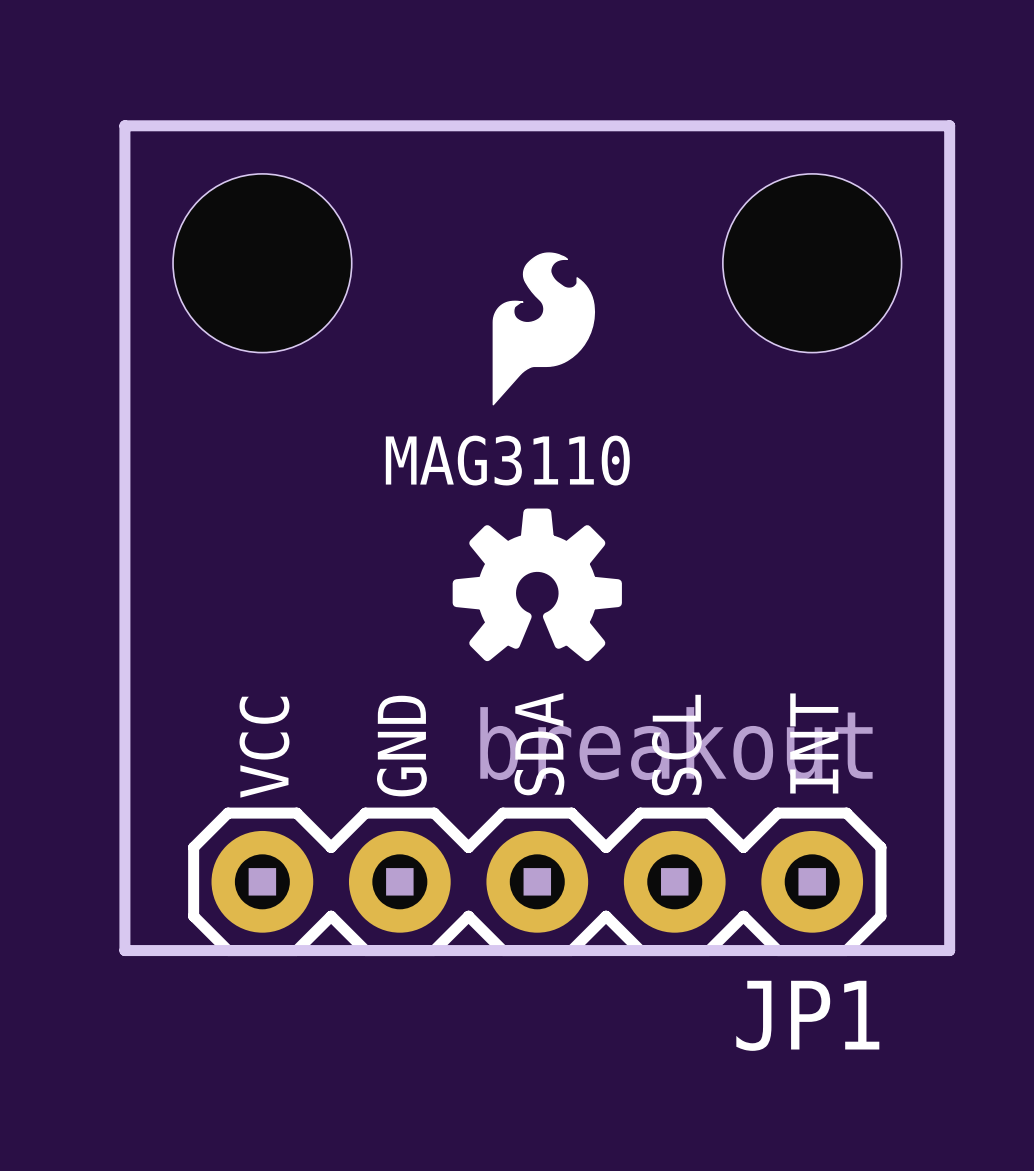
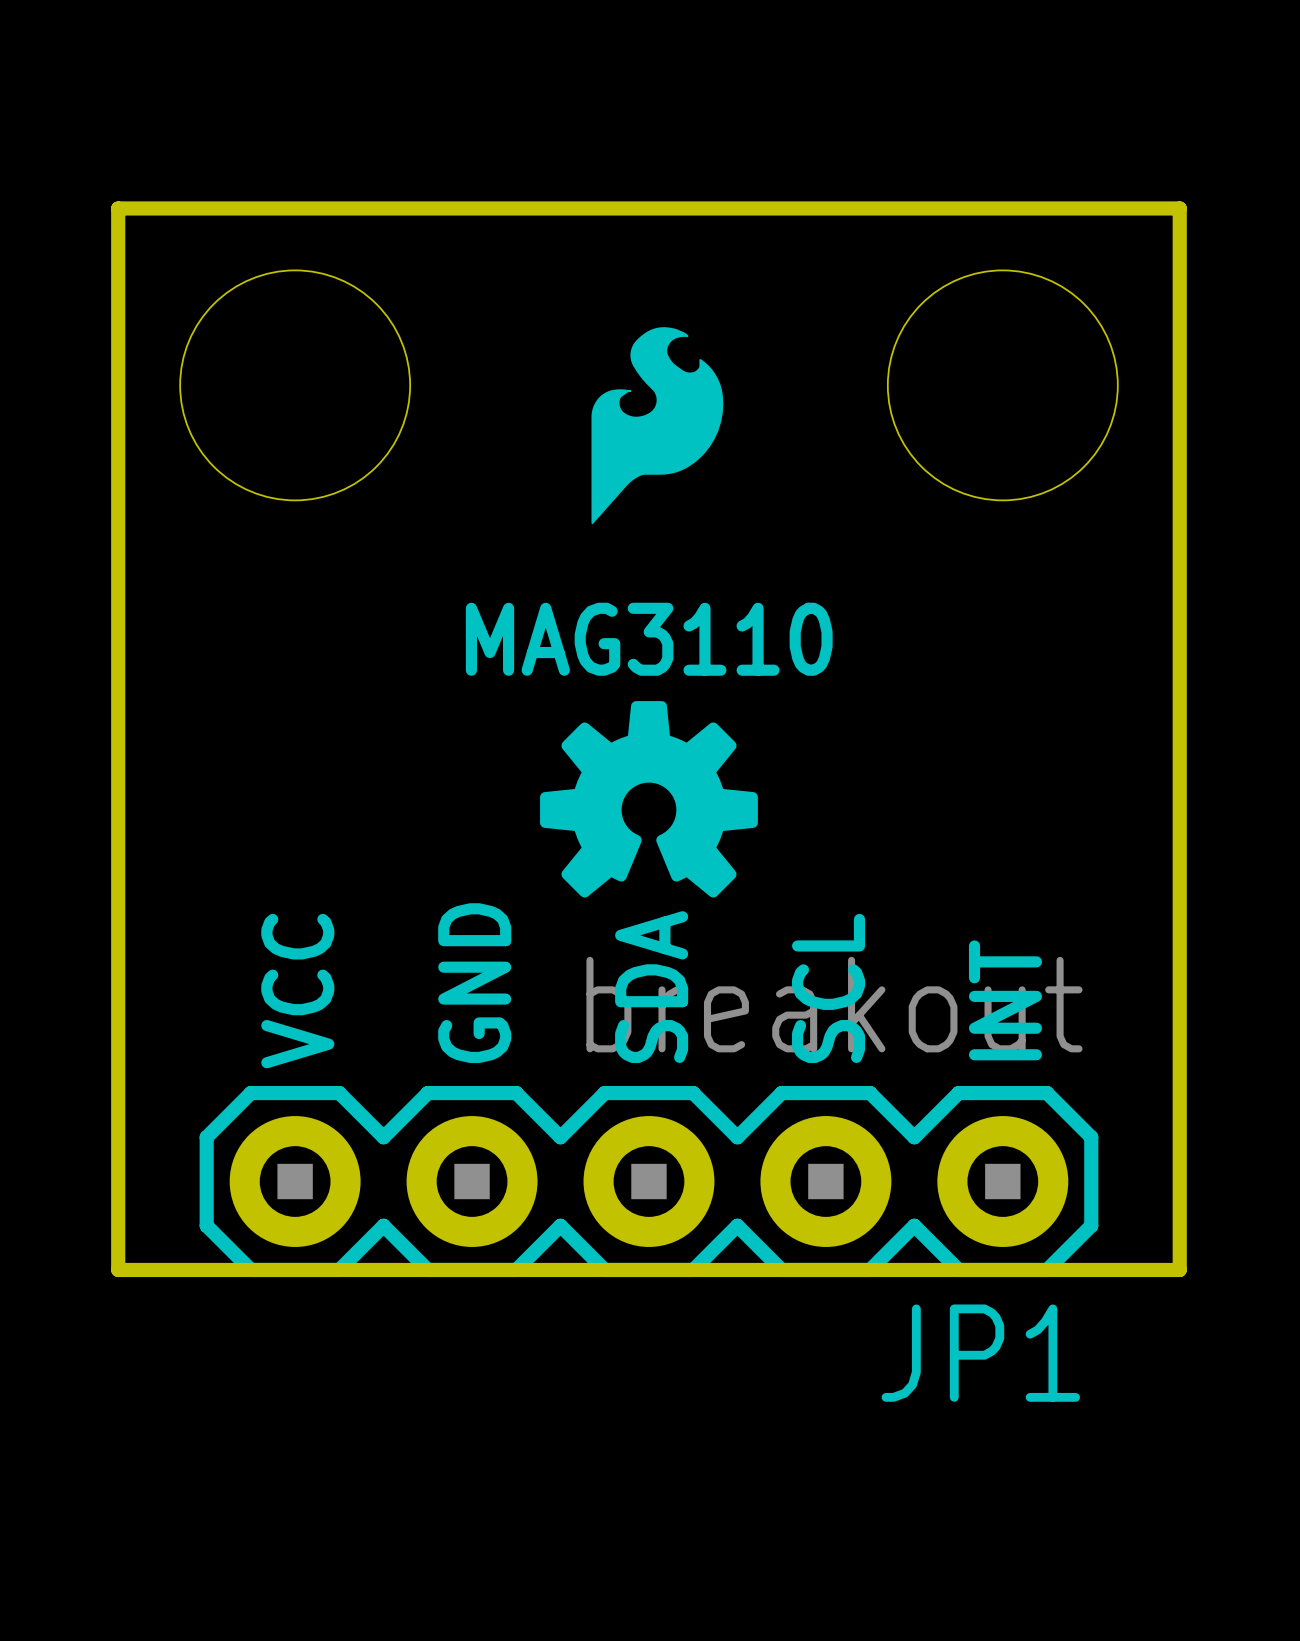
drawing position: (543, 328) -> (657, 425)

